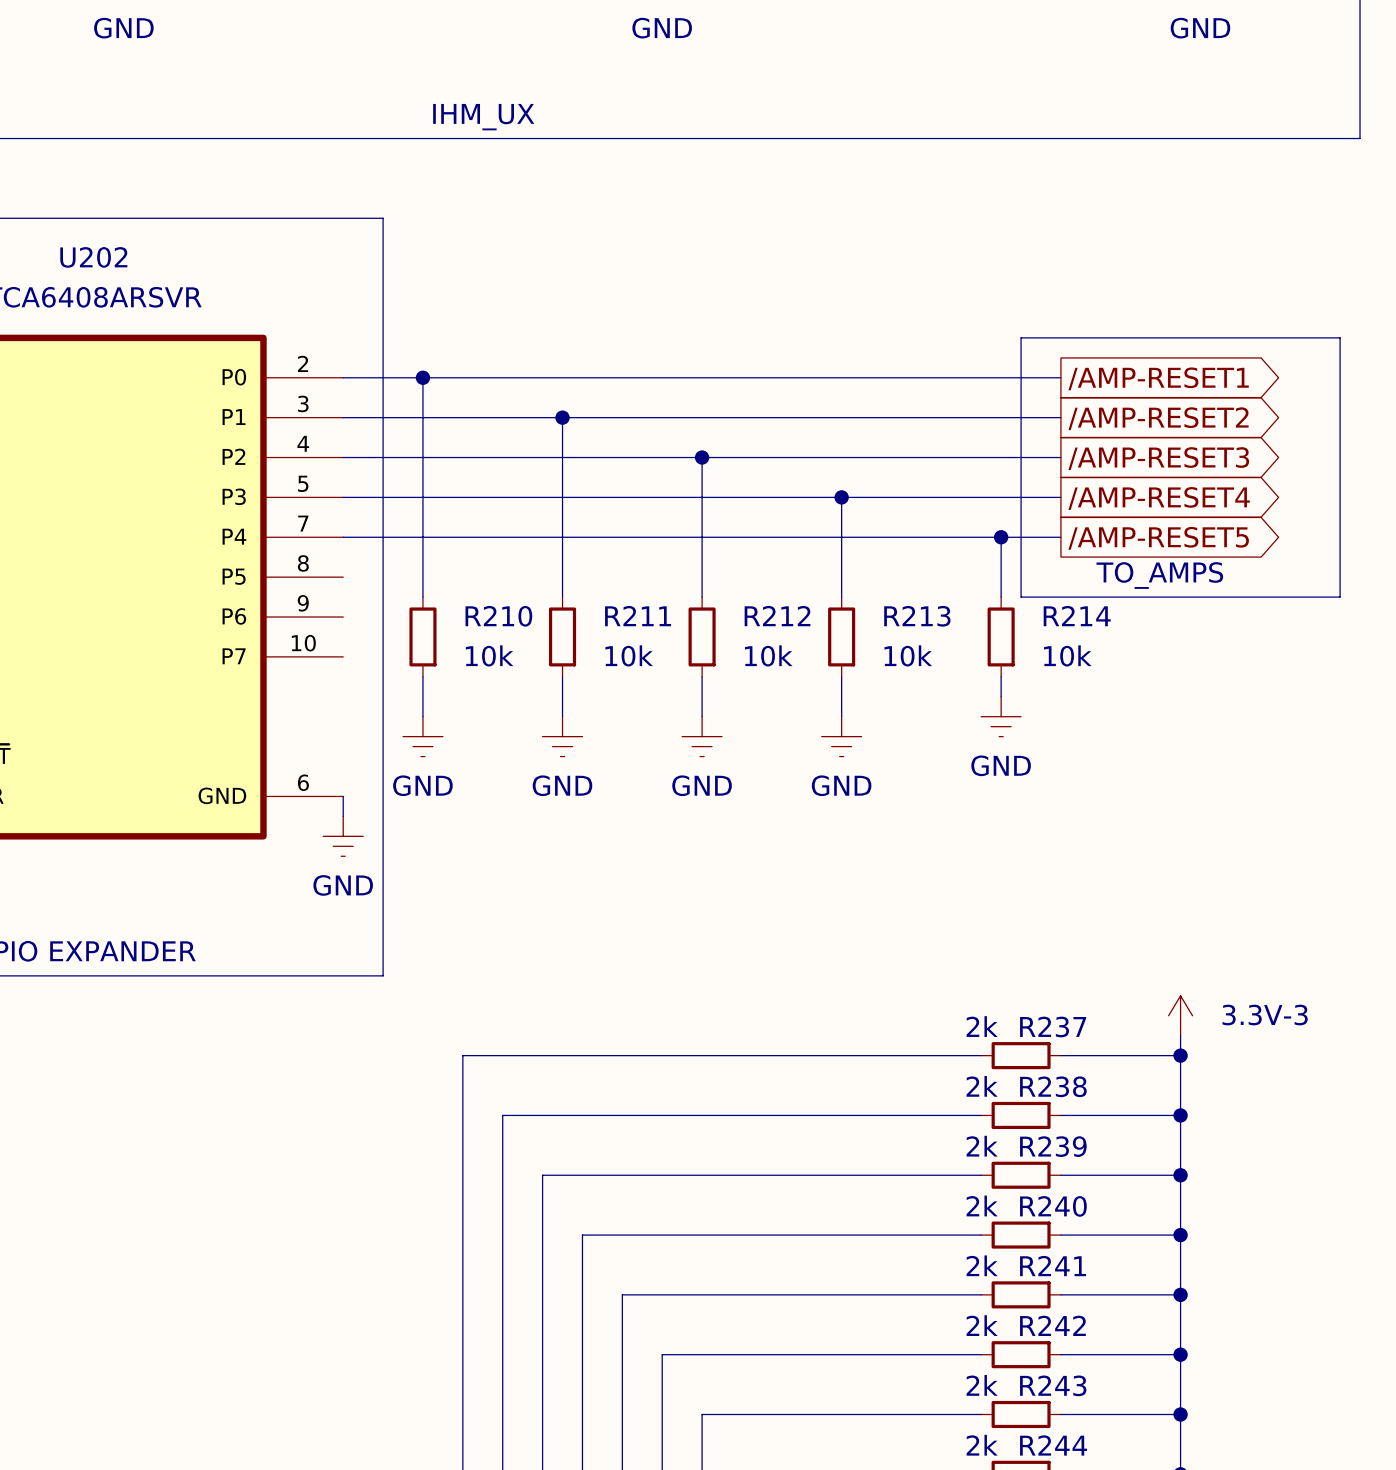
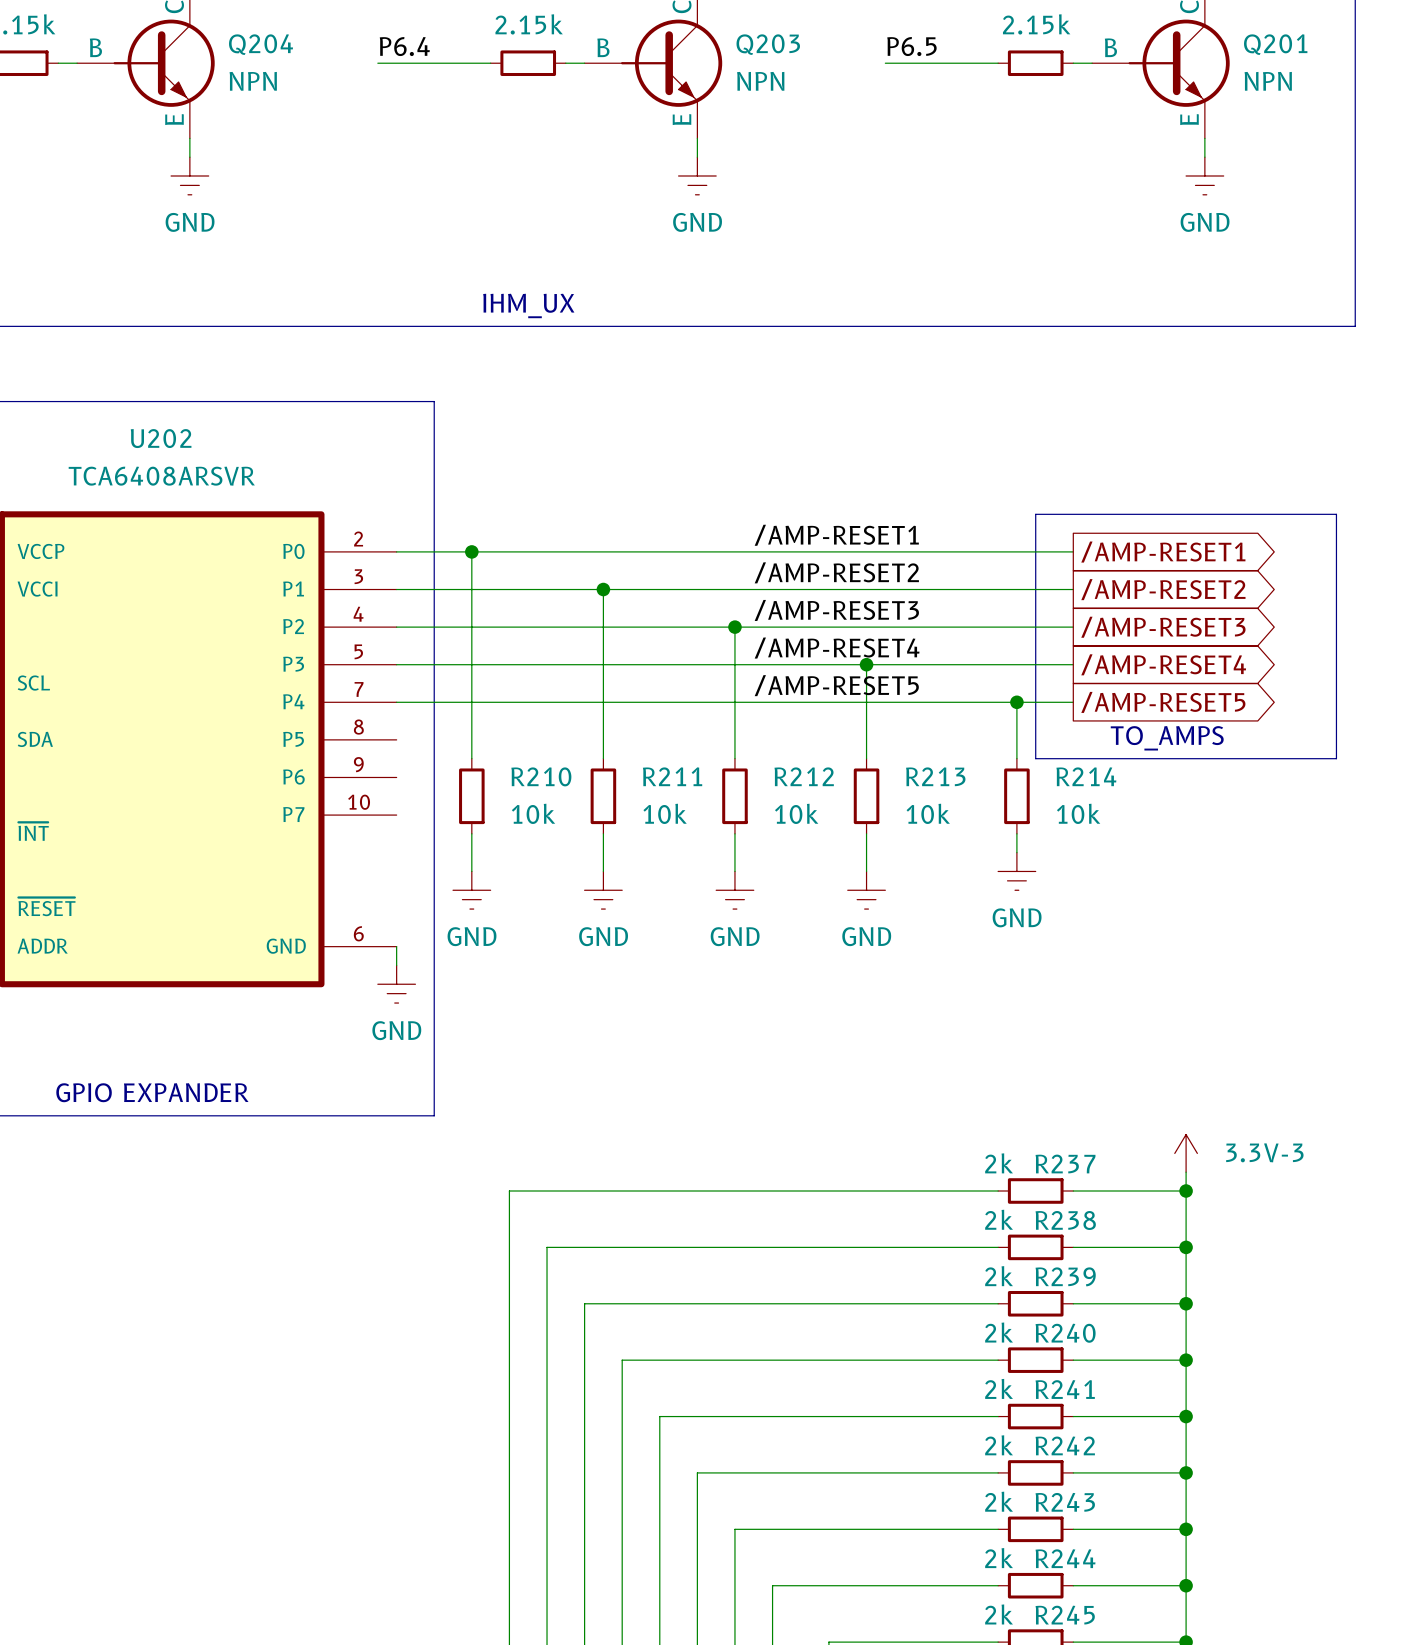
label: none -> /AMP-RESET1 (836, 535)
label: none -> /AMP-RESET2 (836, 572)
label: none -> /AMP-RESET3 (836, 610)
label: none -> /AMP-RESET4 (837, 648)
label: none -> /AMP-RESET5 (836, 685)

